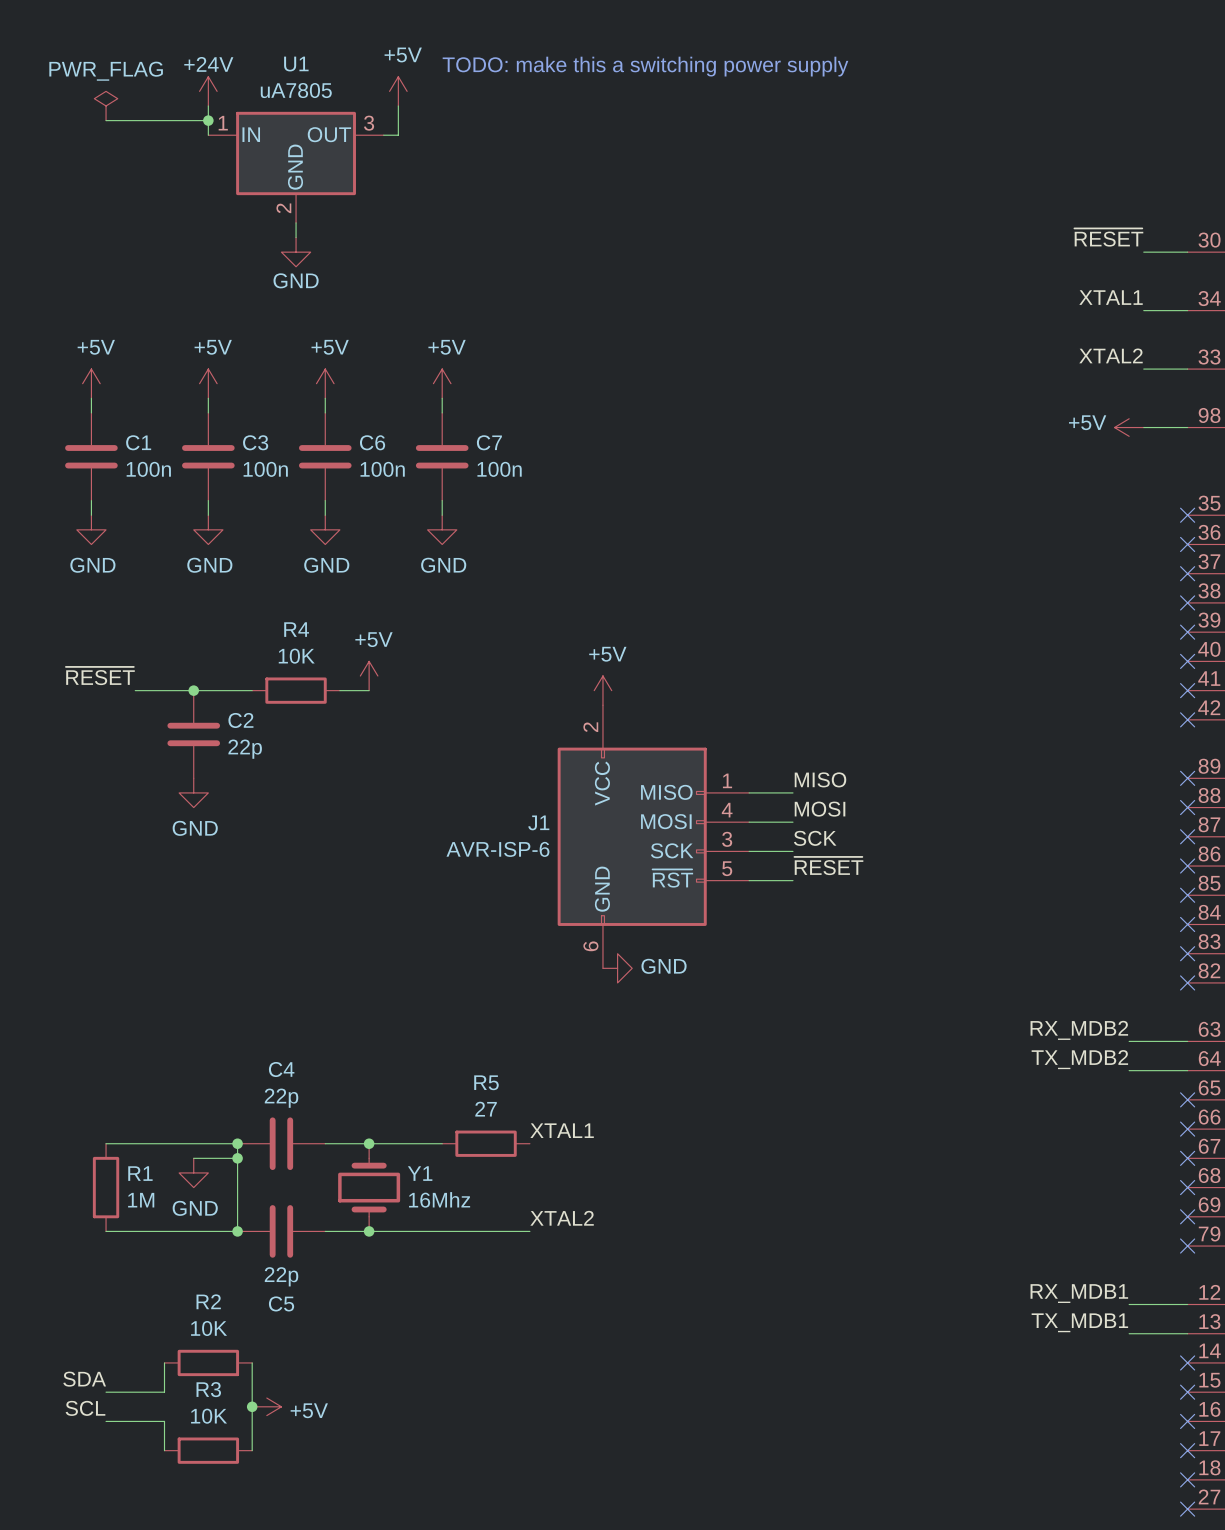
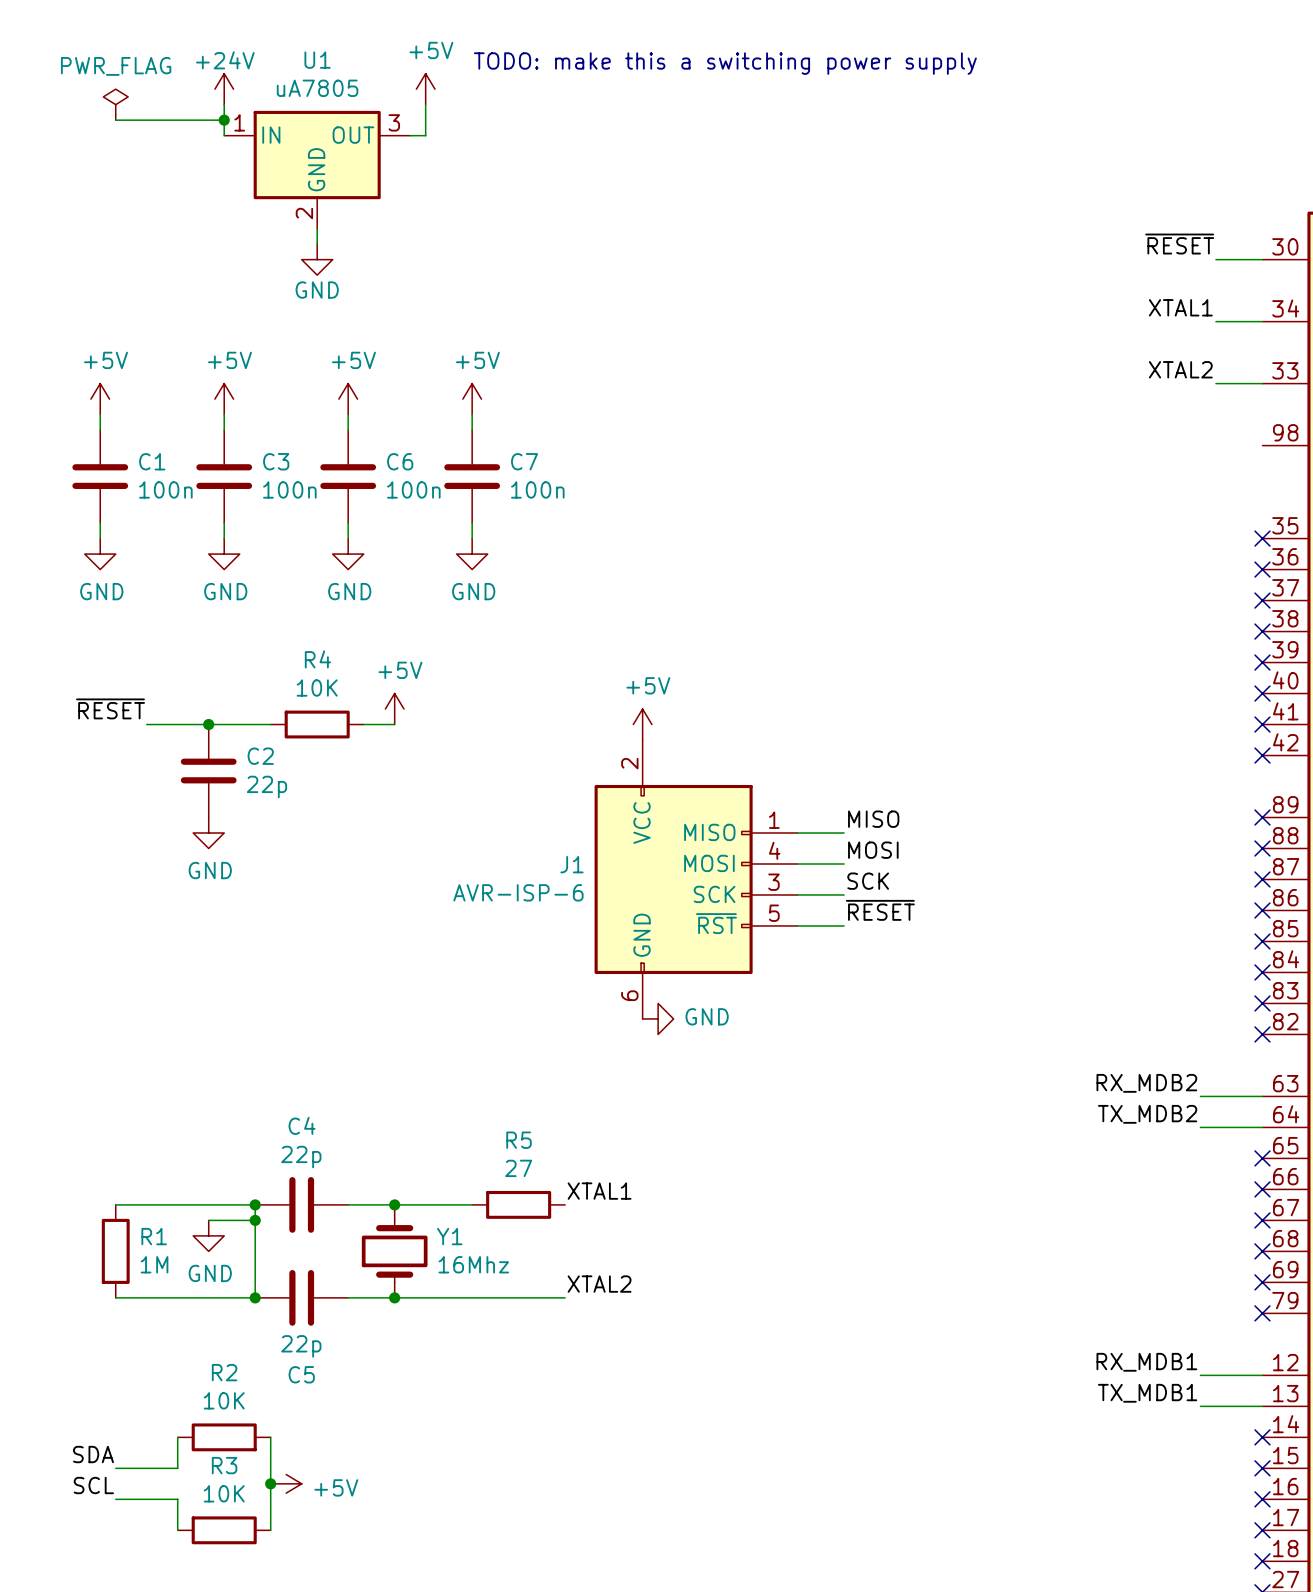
power symbol: +5V (1129, 427) -> none
wire: (1143, 427) (1187, 427) -> none

